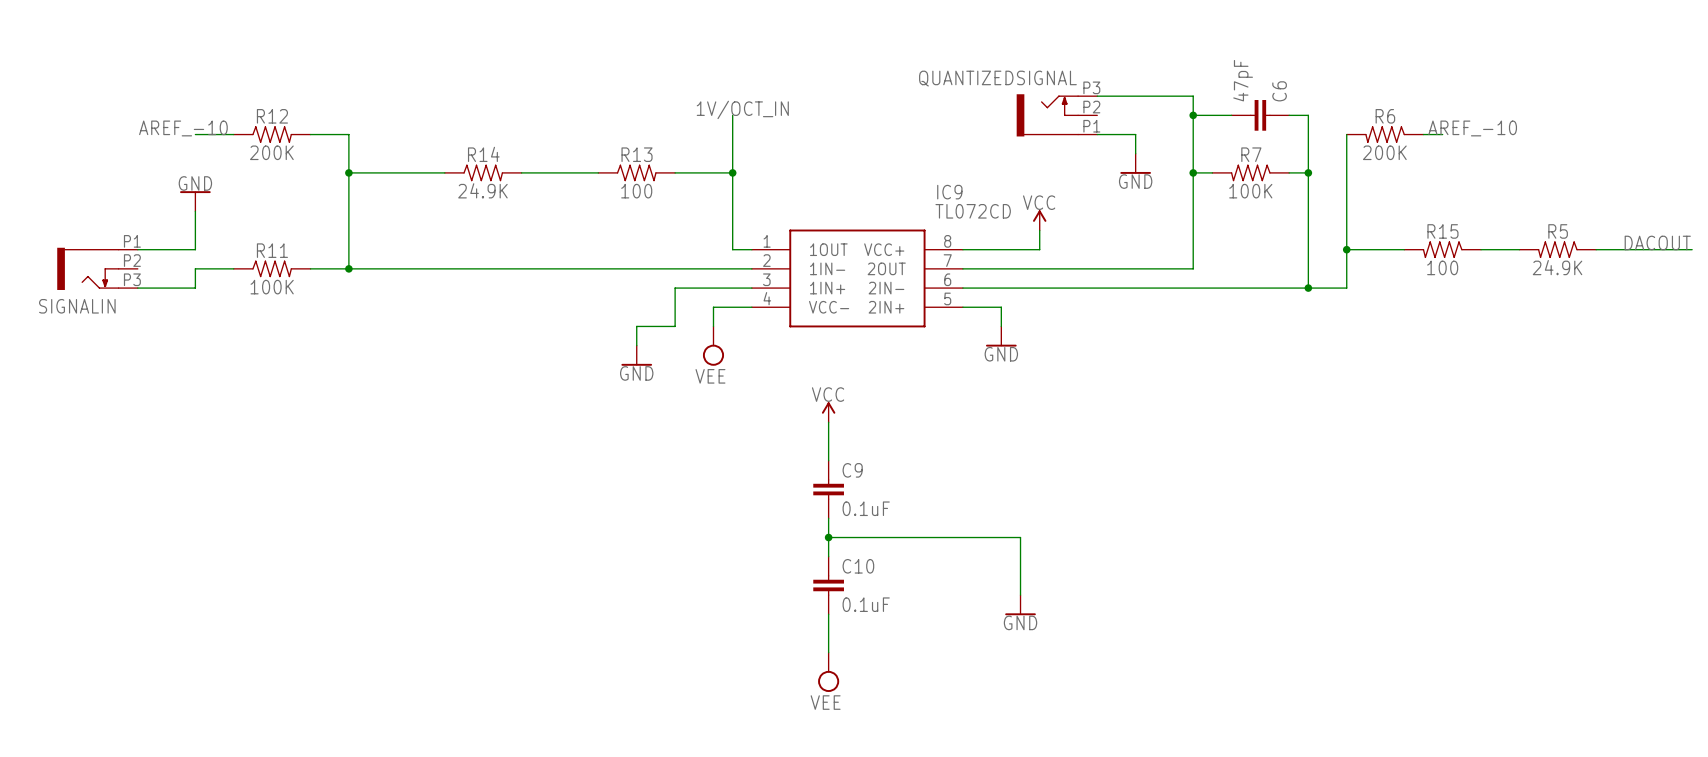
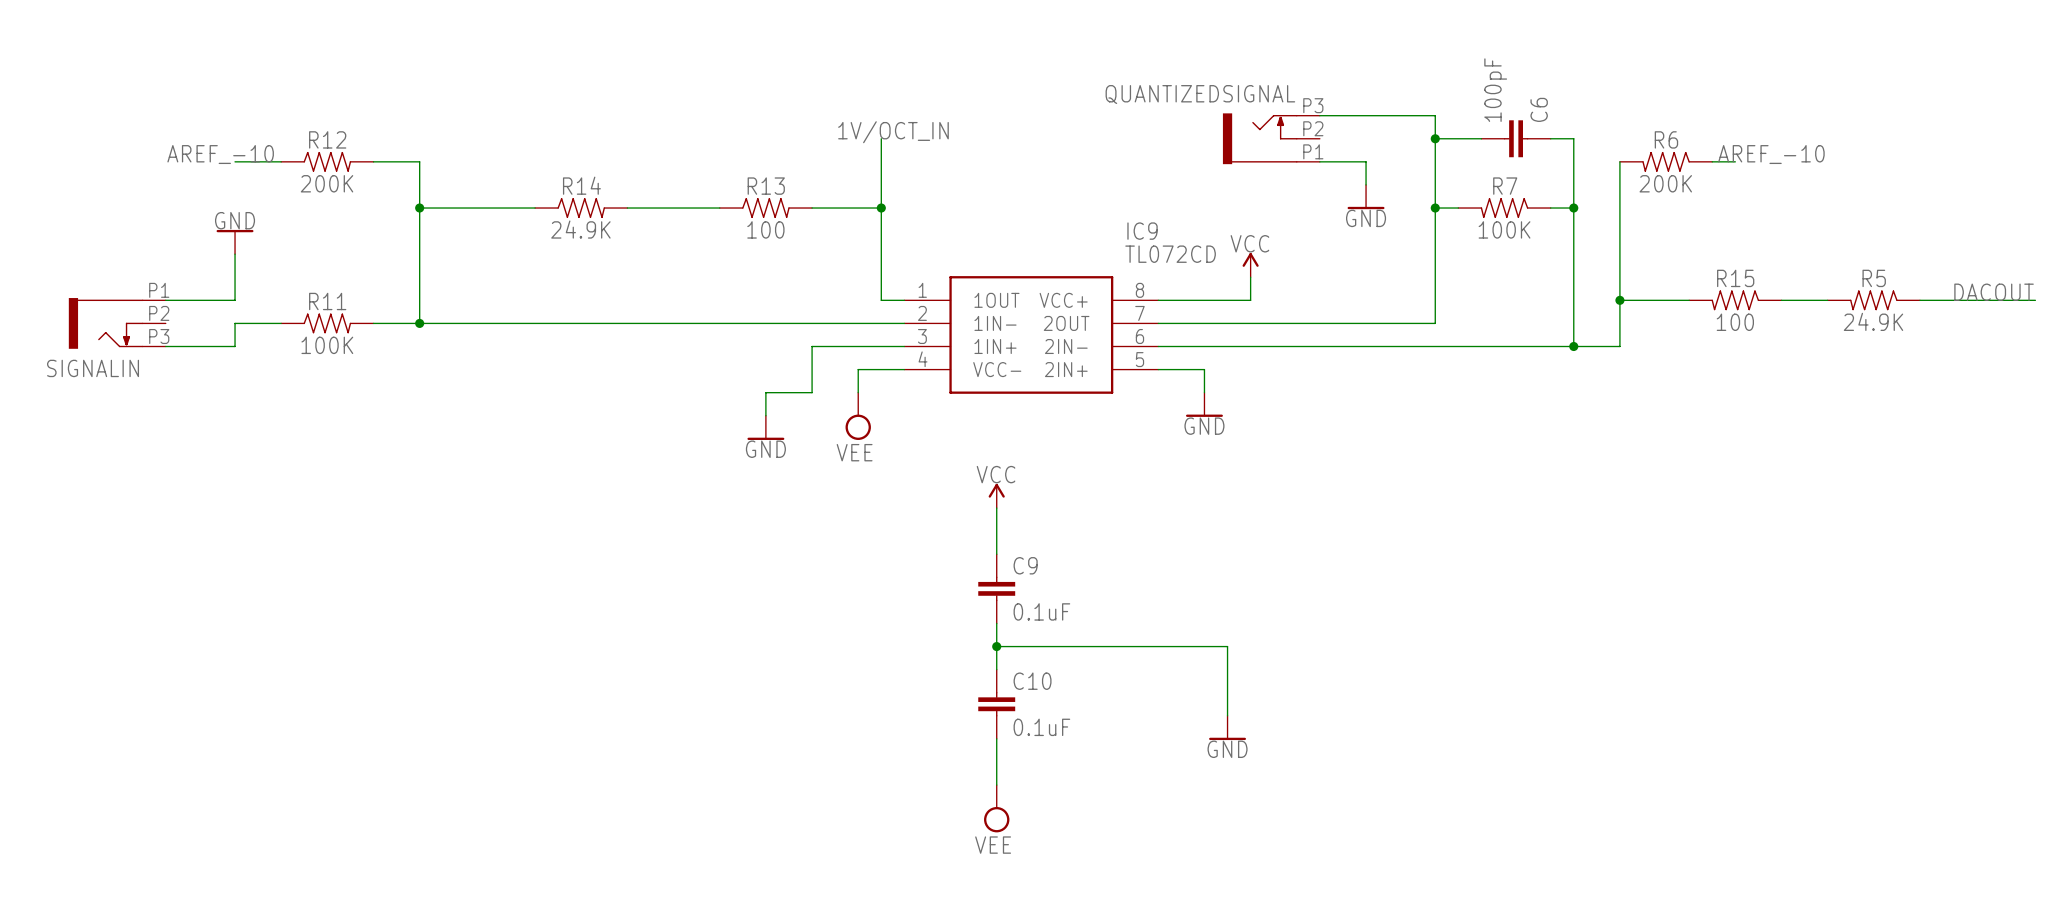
C6 value: 47pF (1243, 80) -> 100pF (1495, 90)

